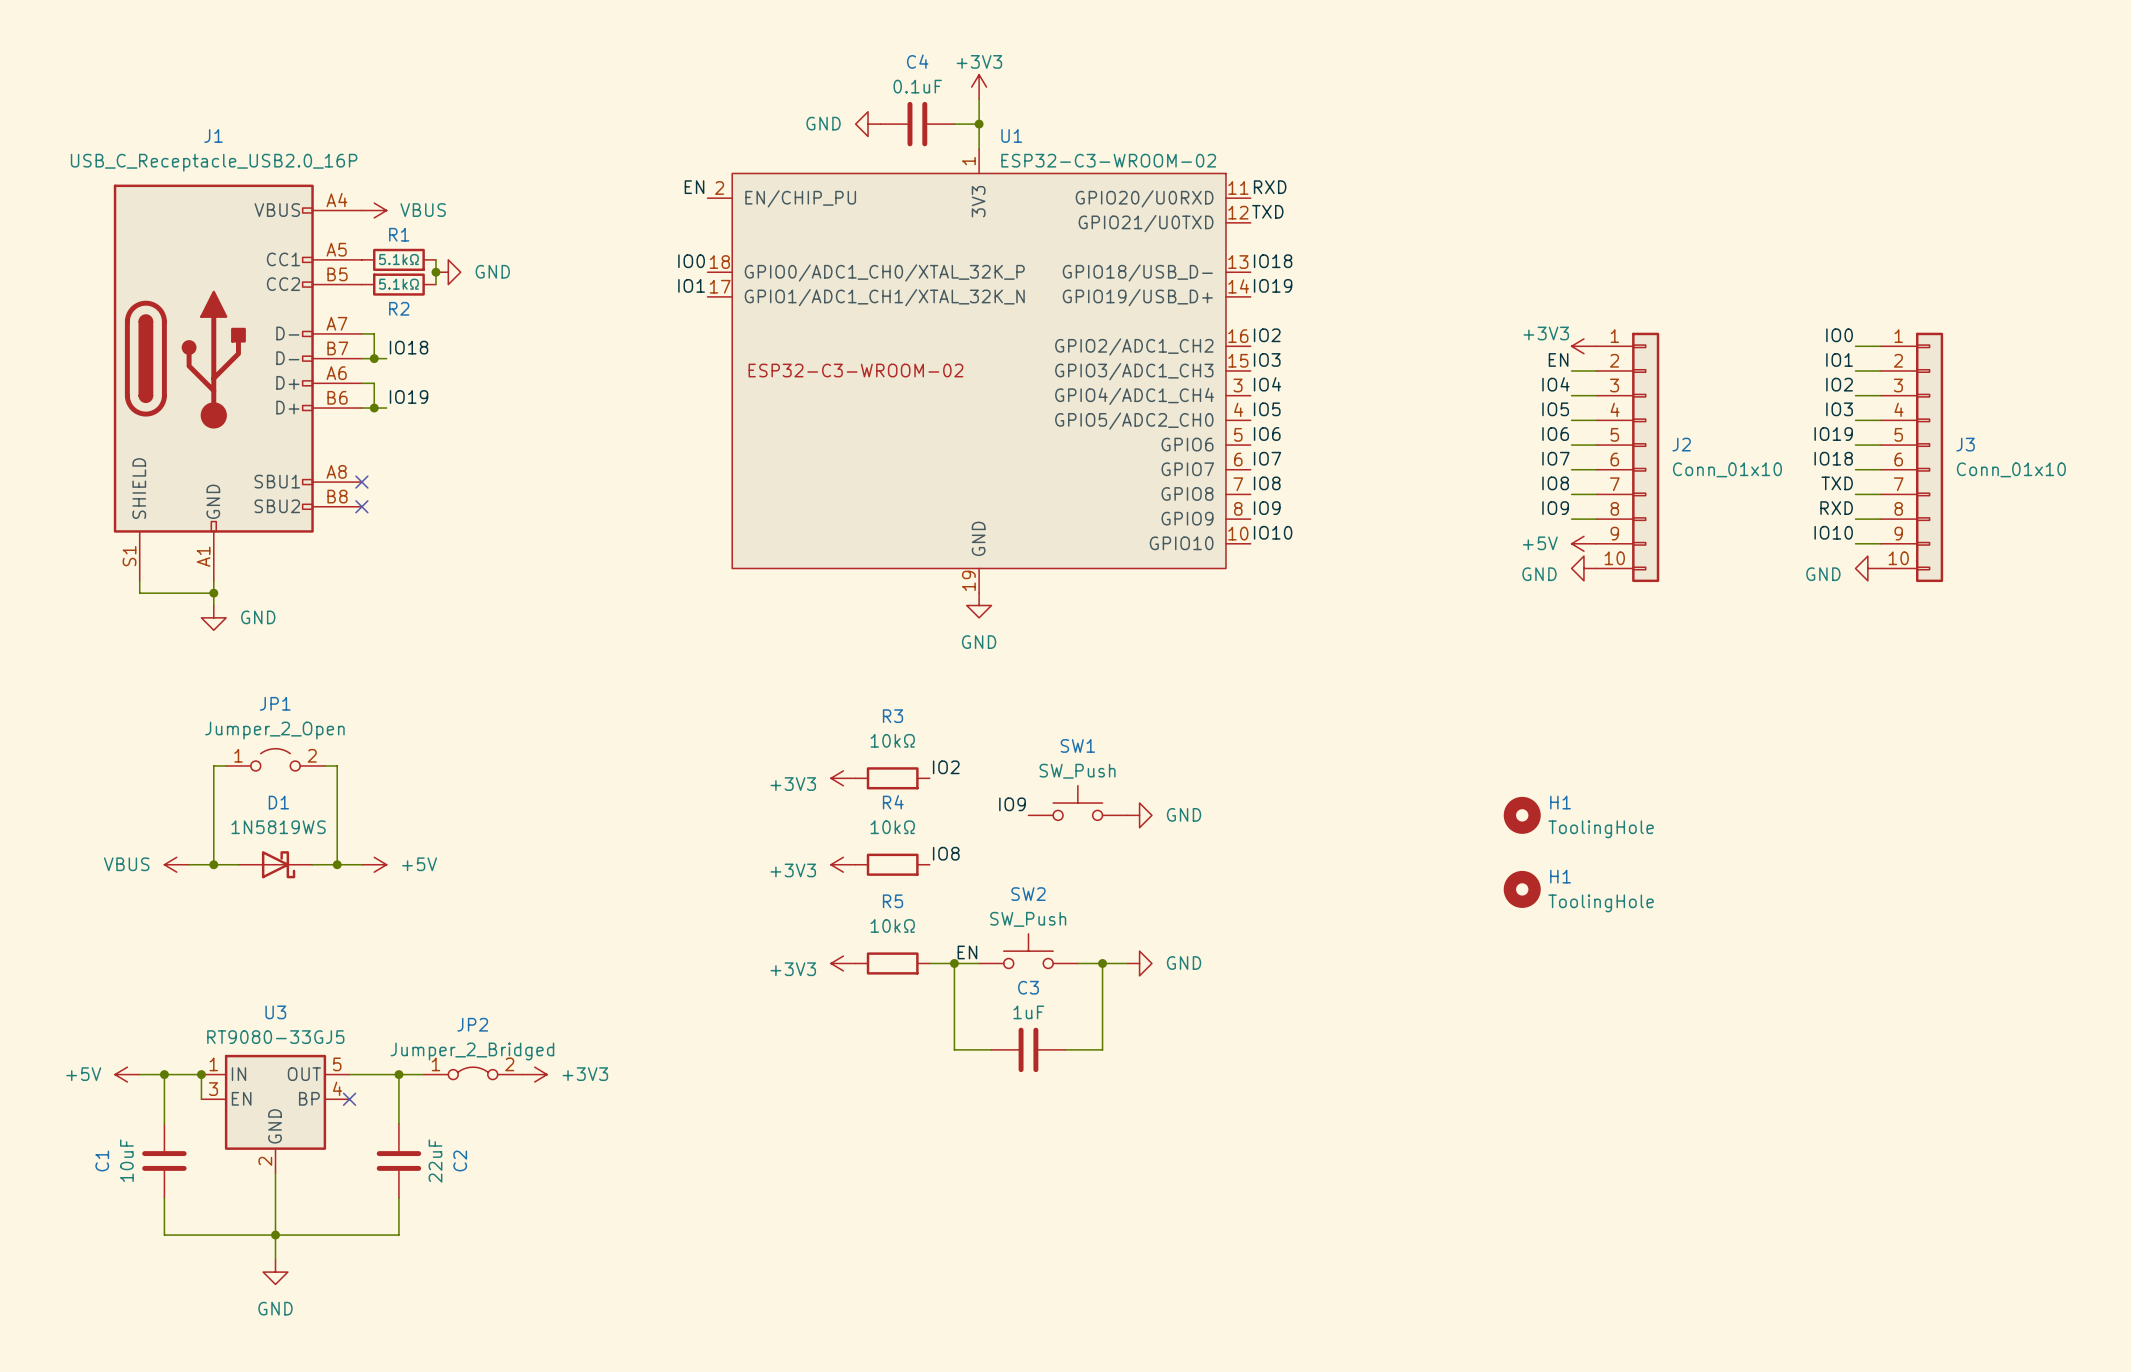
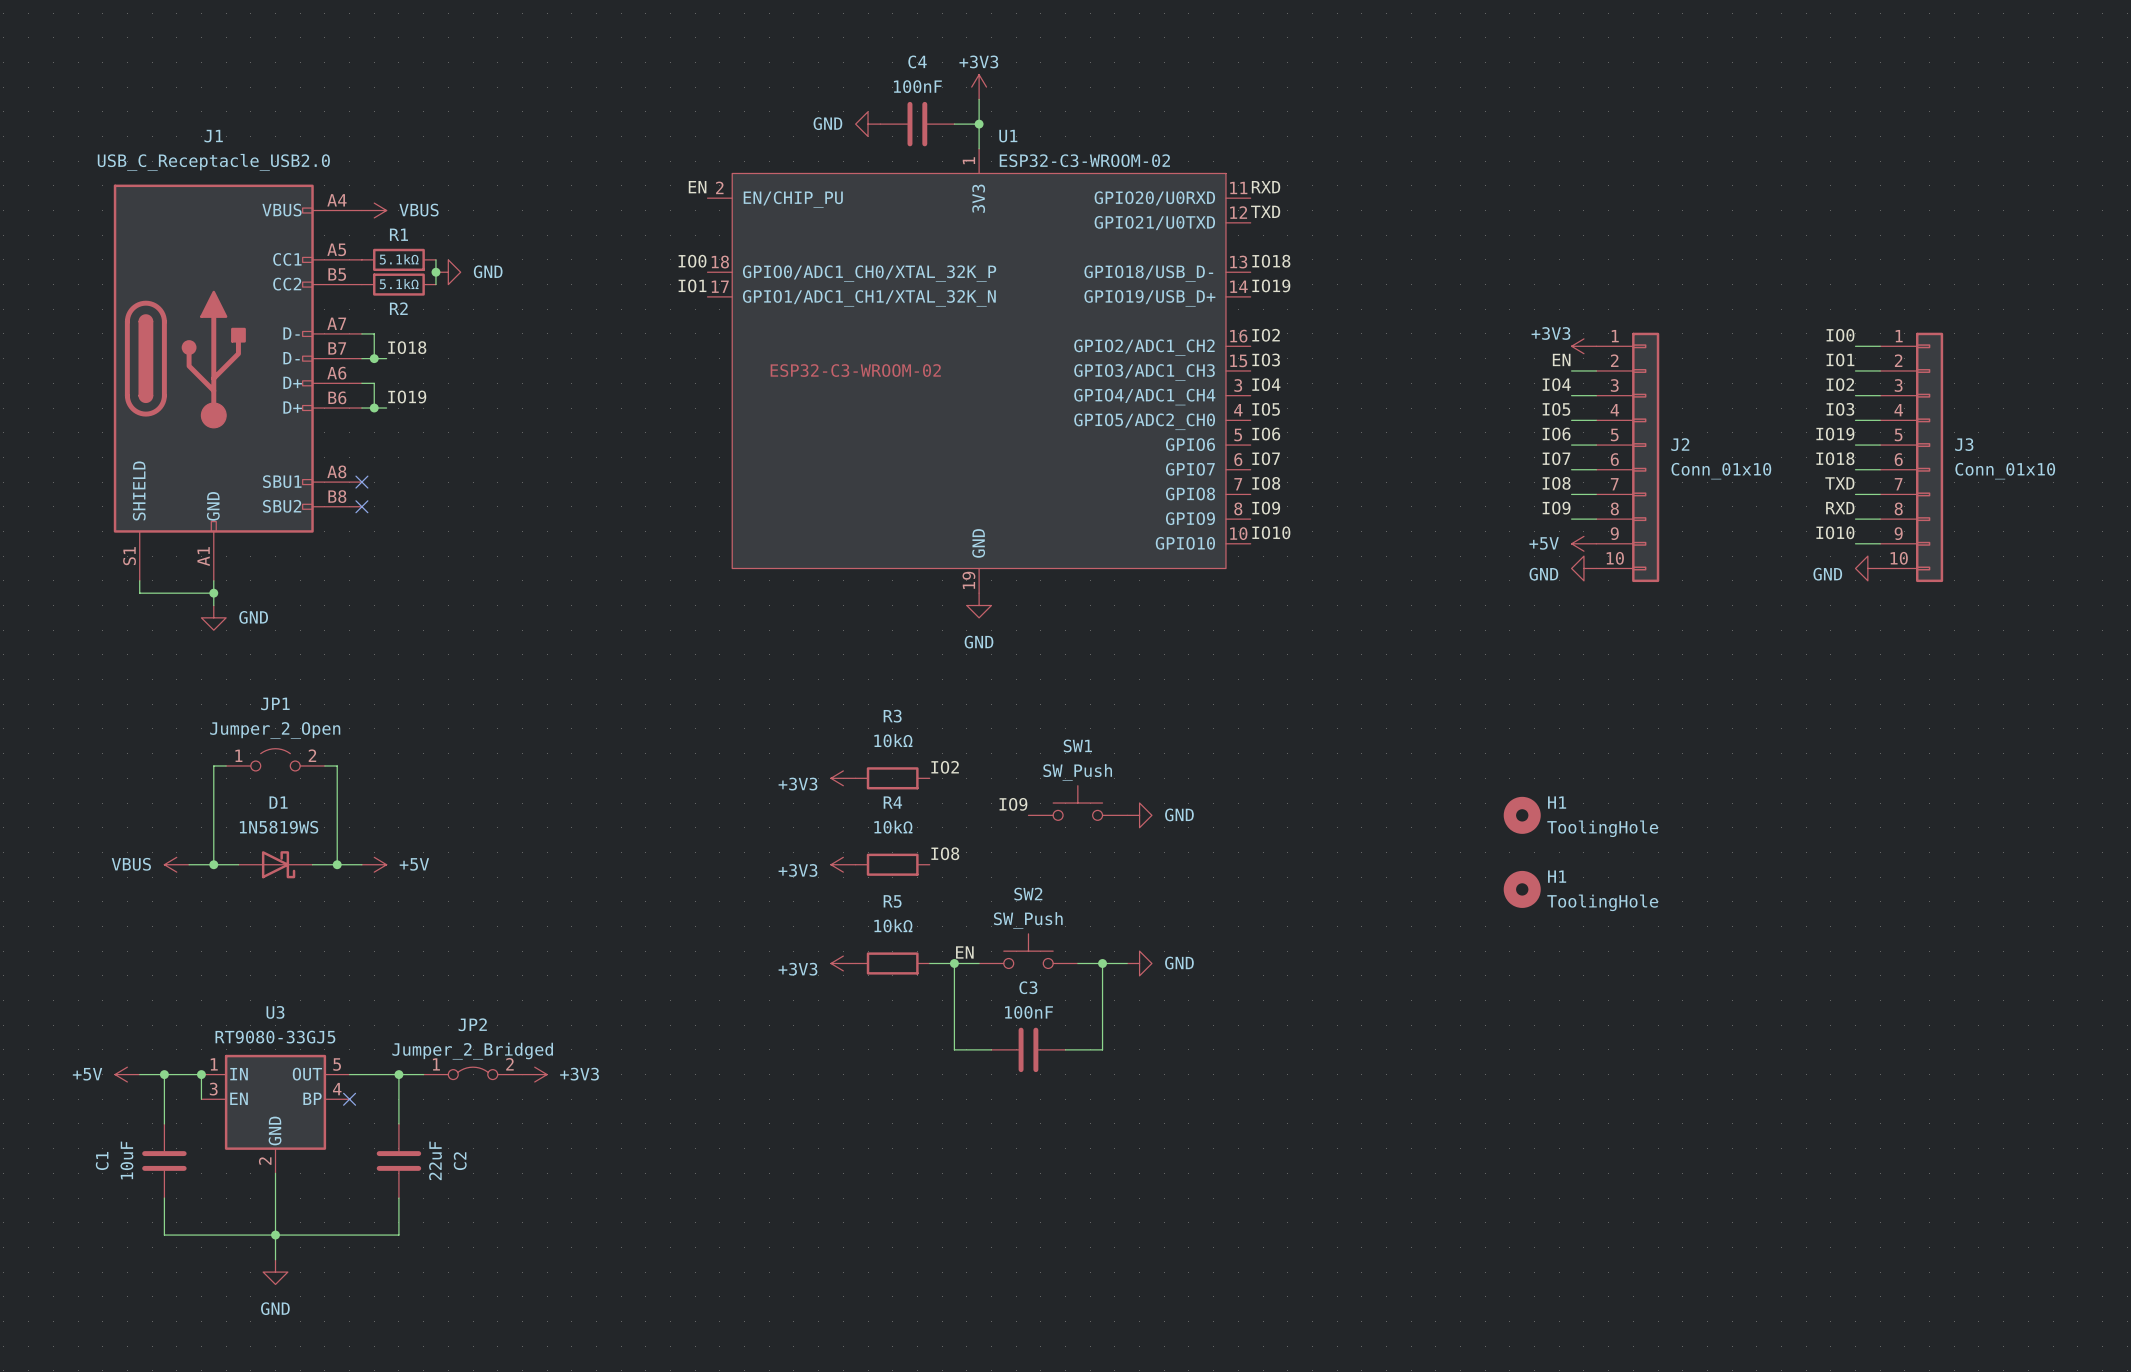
C4 value: 0.1uF (917, 86) -> 100nF (917, 86)
J1 value: USB_C_Receptacle_USB2.0_16P (214, 162) -> USB_C_Receptacle_USB2.0 (213, 162)
C3 value: 1uF (1028, 1012) -> 100nF (1028, 1012)

